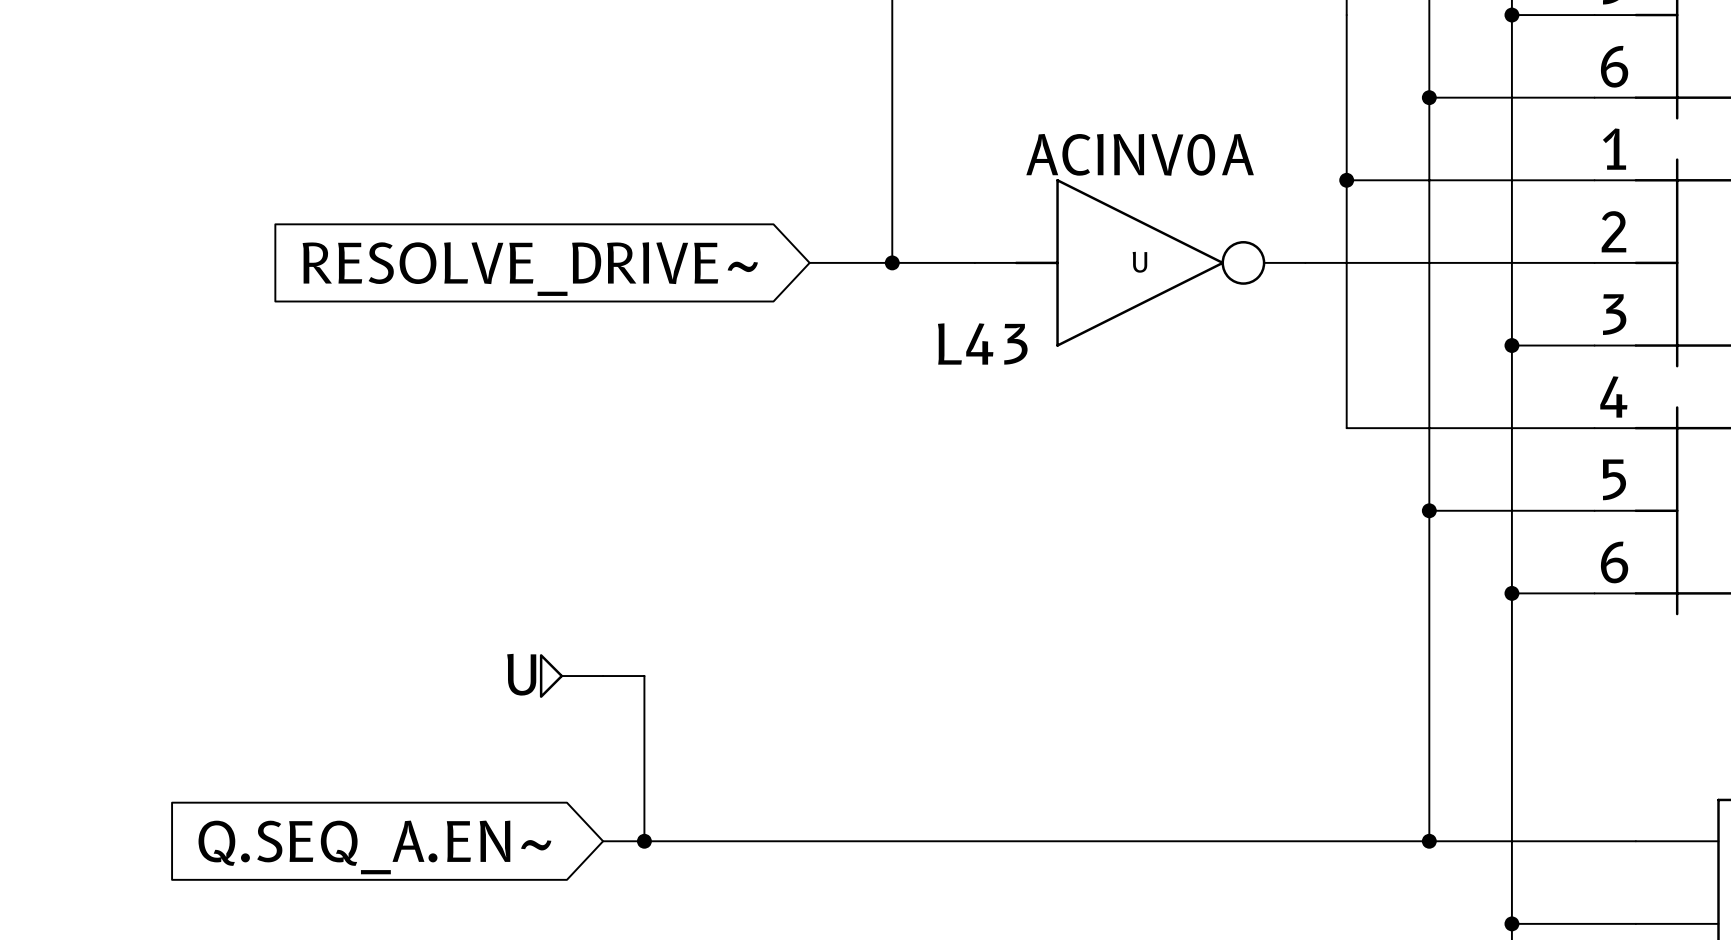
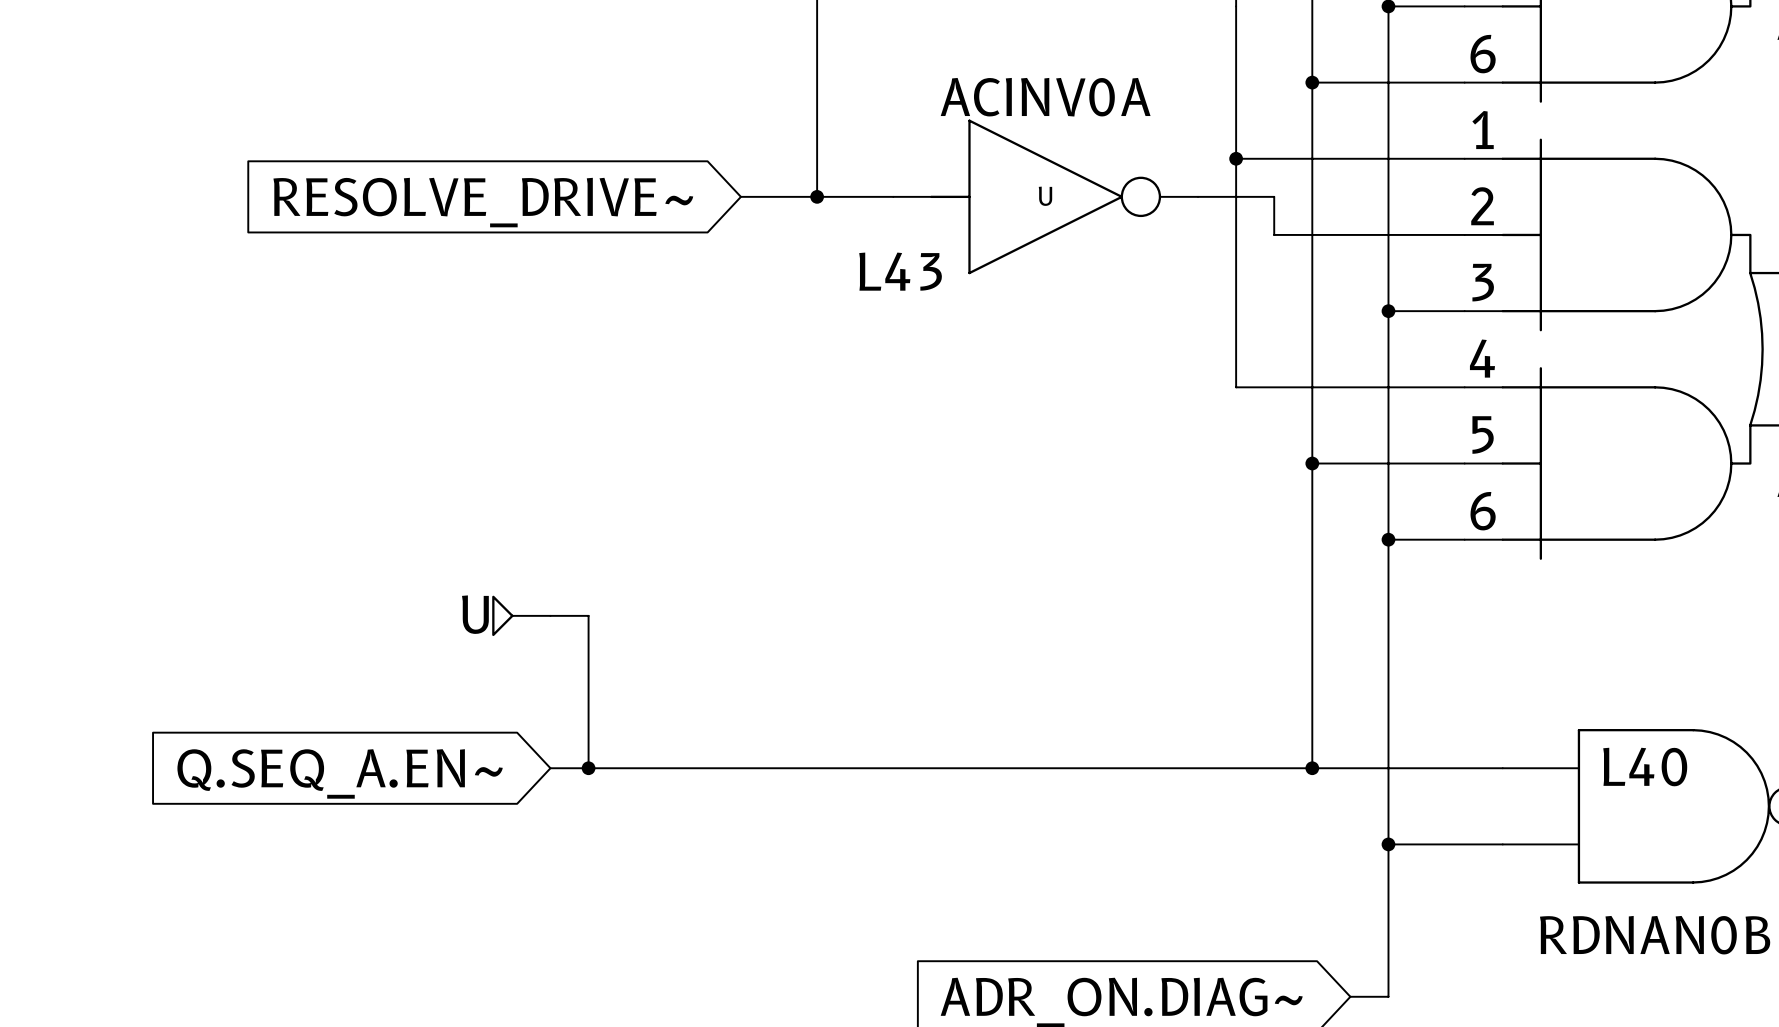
wire: (892, 221) (892, 262) -> none
wire: (809, 262) (974, 262) -> (740, 196) (893, 196)
junction position: (892, 262) -> (817, 196)
U position: (1140, 262) -> (1045, 196)
wire: (1305, 262) (1388, 262) -> (1198, 196) (1274, 196) (1274, 234)
global label position: RESOLVE_DRIVE~ (530, 269) -> RESOLVE_DRIVE~ (483, 202)

